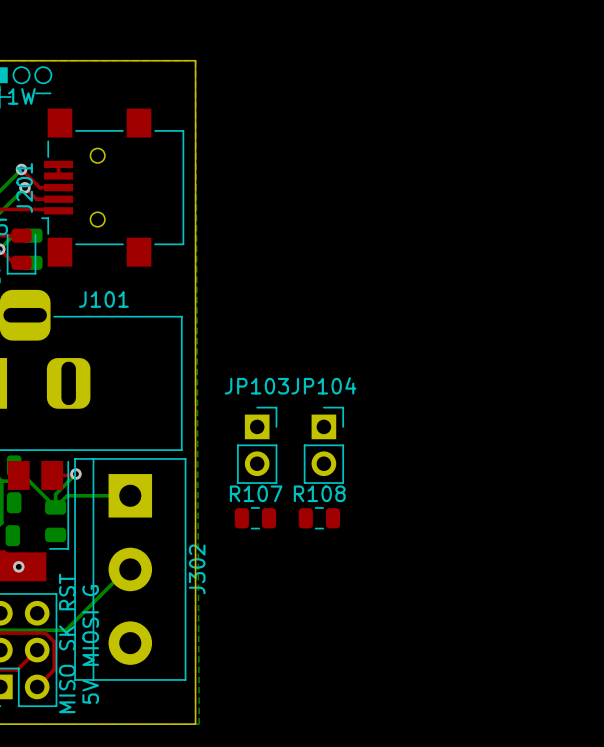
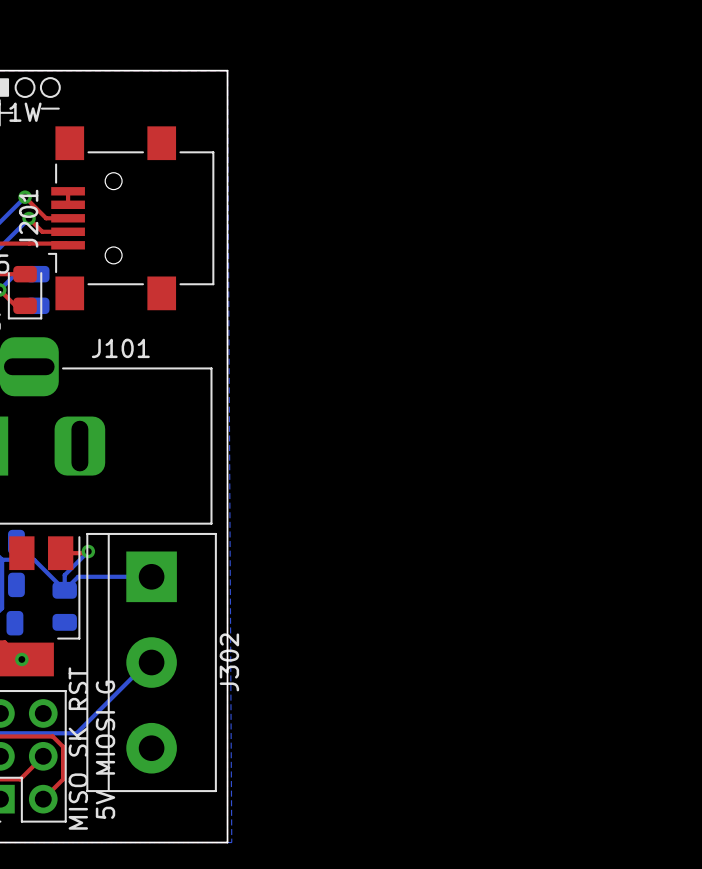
JP103: (257, 445) -> none
JP104: (323, 445) -> none
R107: (255, 518) -> none
R108: (319, 518) -> none

